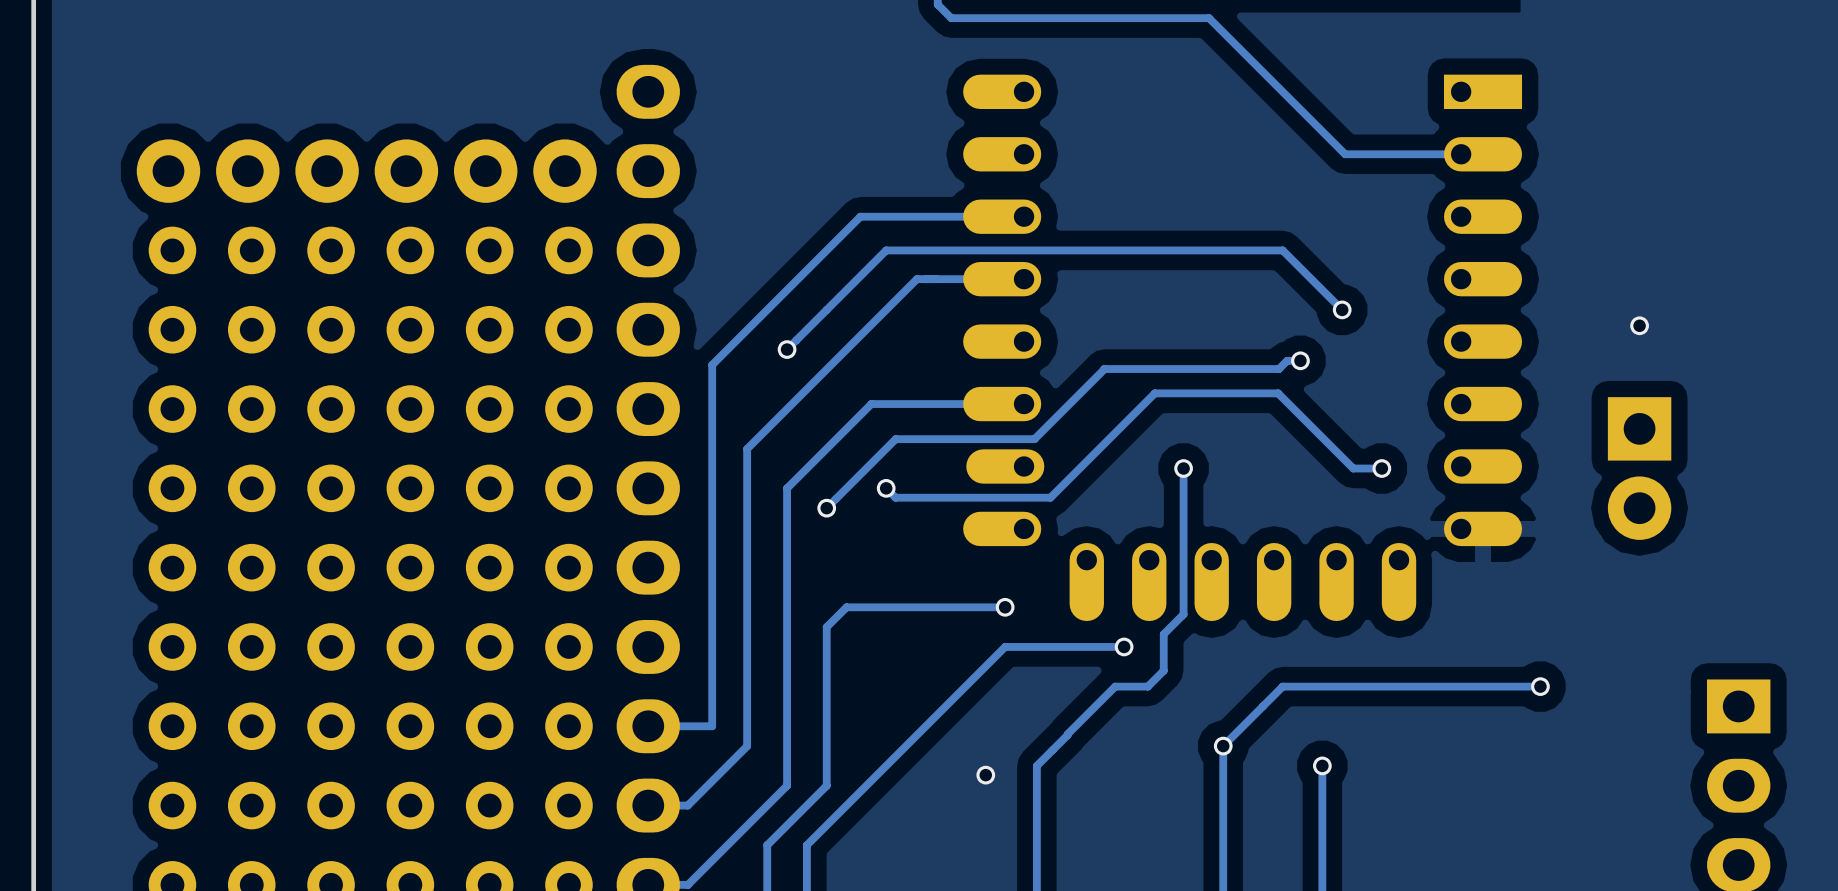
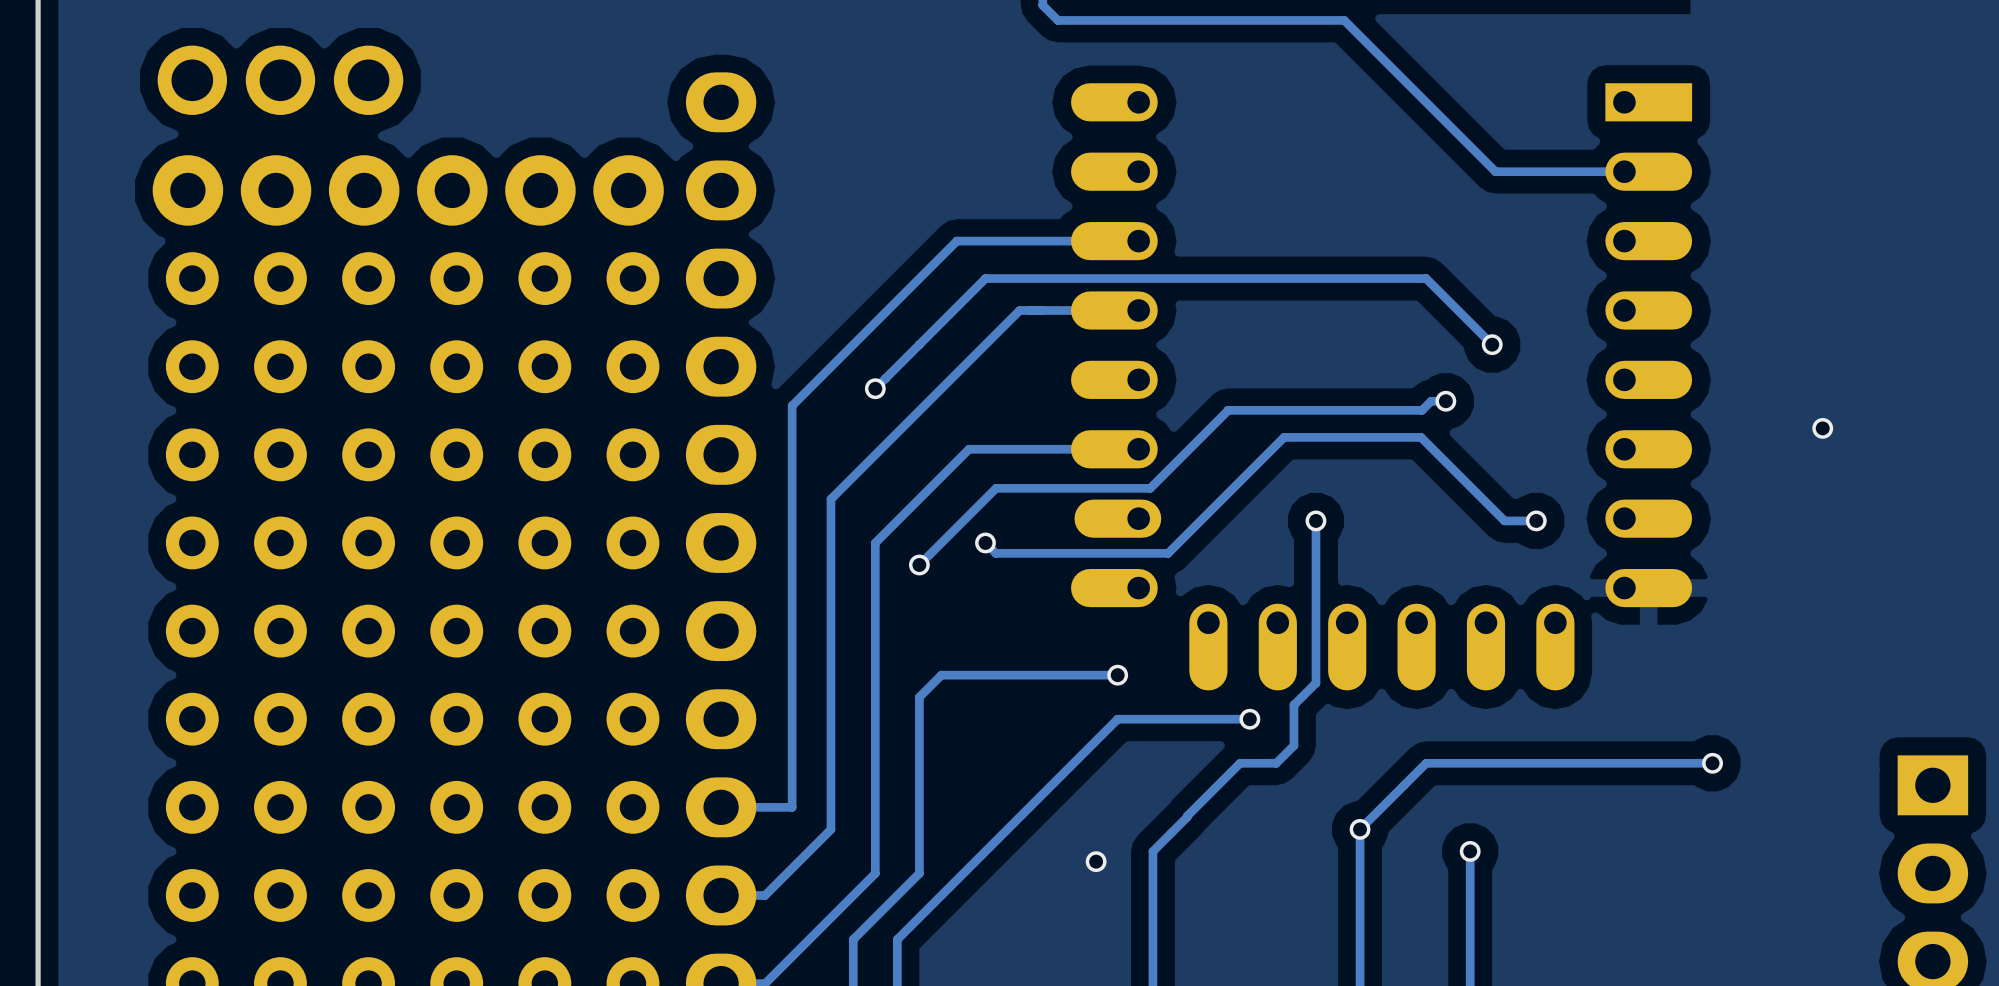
part: none -> (280, 80)
via position: (1639, 325) -> (1822, 428)
part: (1639, 468) -> none

